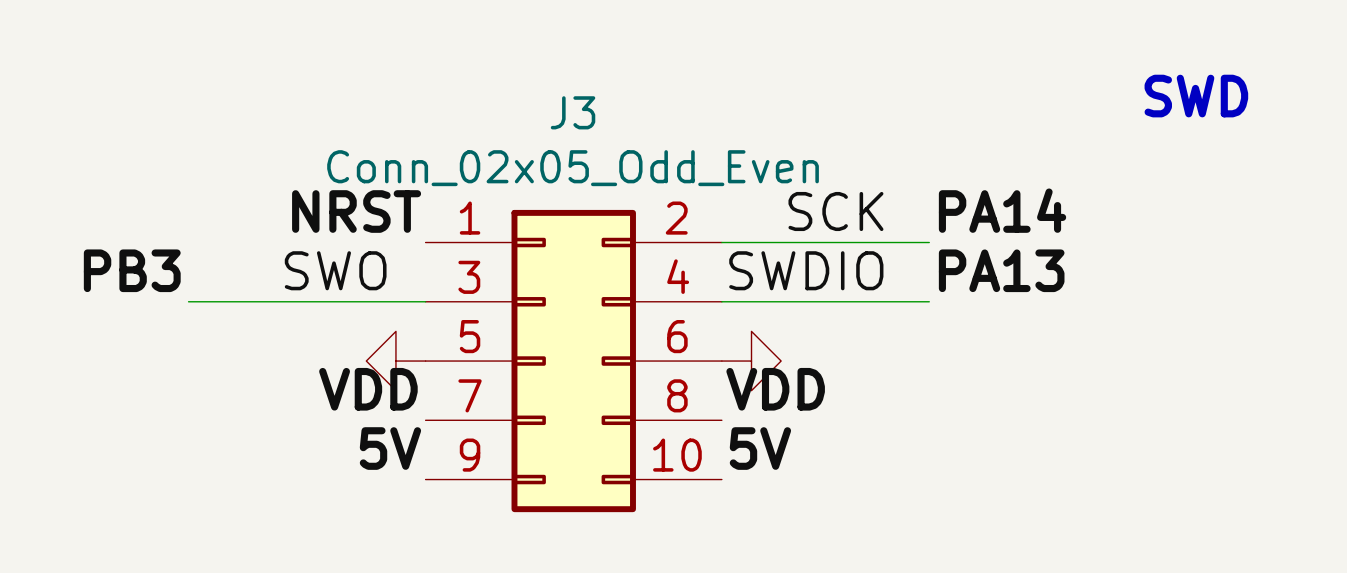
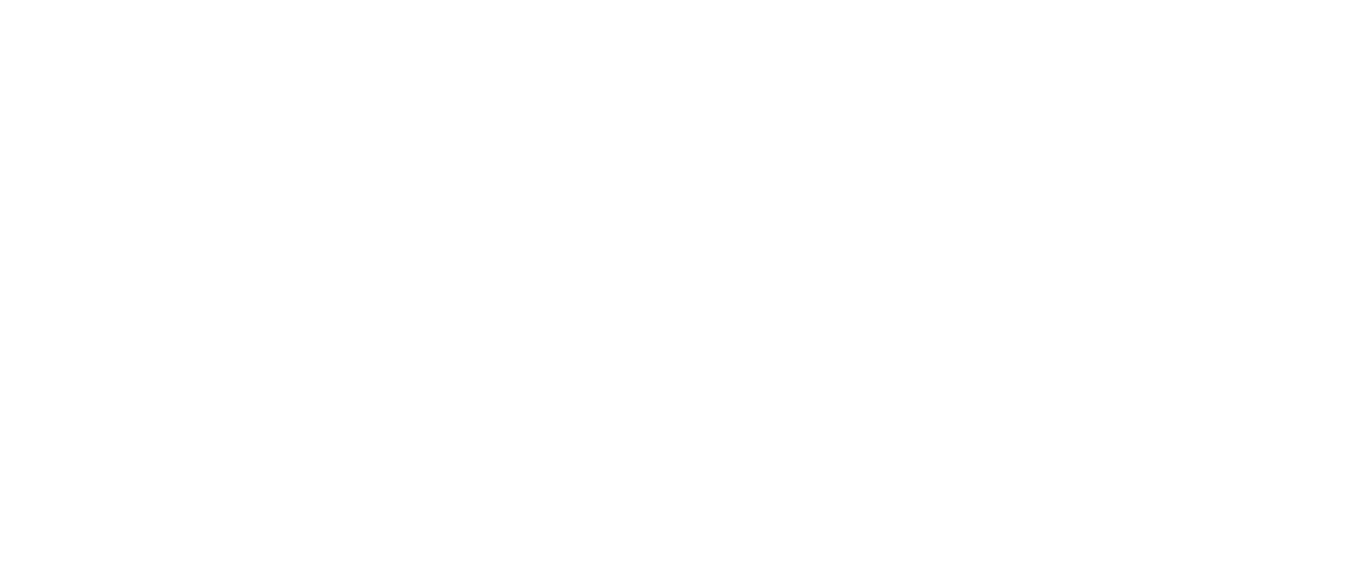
text: SWD (1196, 96) -> none
label: PA14 (1002, 210) -> none
label: NRST (356, 211) -> none
label: SCK (835, 211) -> none
wire: (721, 242) (929, 242) -> none
label: PB3 (132, 270) -> none
label: SWO (335, 270) -> none
label: SWDIO (806, 270) -> none
label: PA13 (1001, 270) -> none
wire: (188, 301) (425, 301) -> none
wire: (721, 301) (929, 301) -> none
power symbol: (395, 361) -> none
J3: Conn_02x05_Odd_Even (573, 361) -> none
power symbol: (751, 361) -> none
label: VDD (368, 389) -> none
label: VDD (775, 389) -> none
label: 5V (390, 448) -> none
label: 5V (760, 448) -> none

